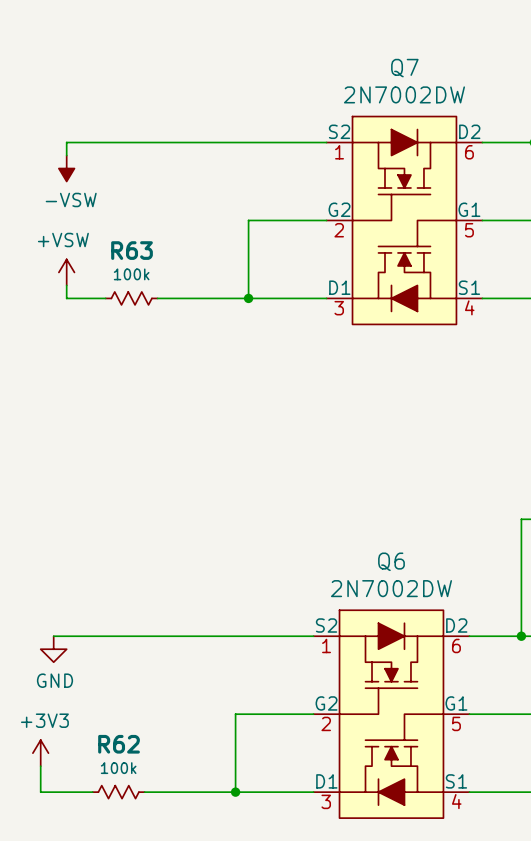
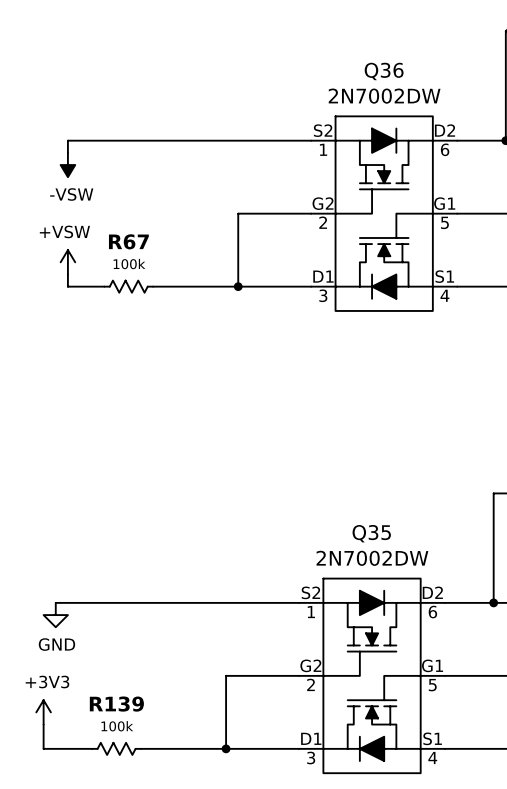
Q7 name: Q7 (404, 68) -> Q36 (384, 71)
R63 name: R63 (132, 250) -> R67 (128, 241)
Q6 name: Q6 (391, 561) -> Q35 (371, 533)
R62 name: R62 (119, 744) -> R139 (116, 704)

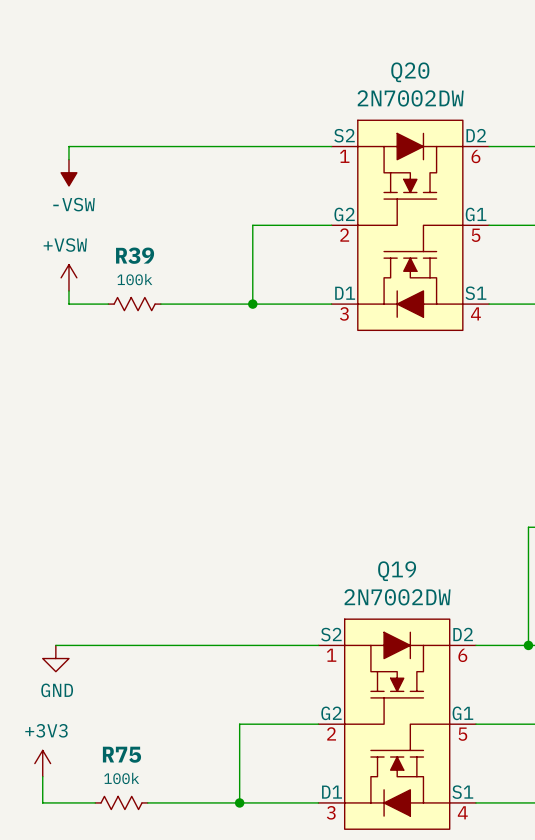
Q36 name: Q36 (384, 71) -> Q20 (410, 72)
R67 name: R67 (128, 241) -> R39 (135, 255)
Q35 name: Q35 (371, 533) -> Q19 (397, 571)
R139 name: R139 (116, 704) -> R75 (121, 754)

